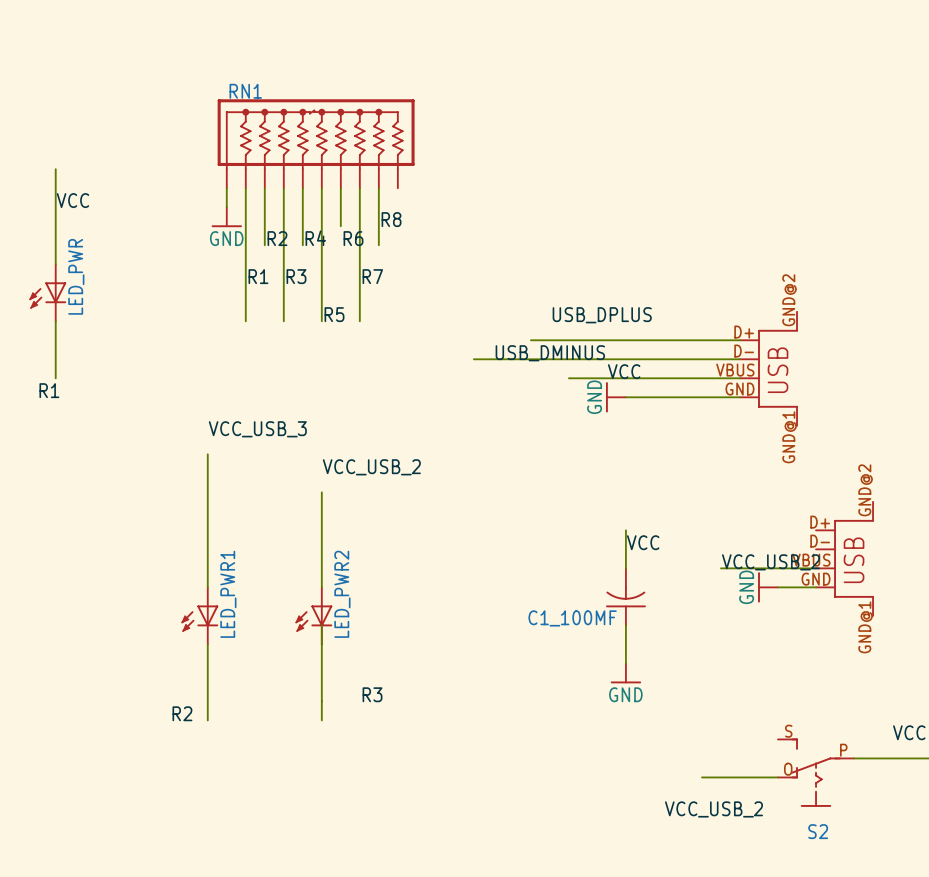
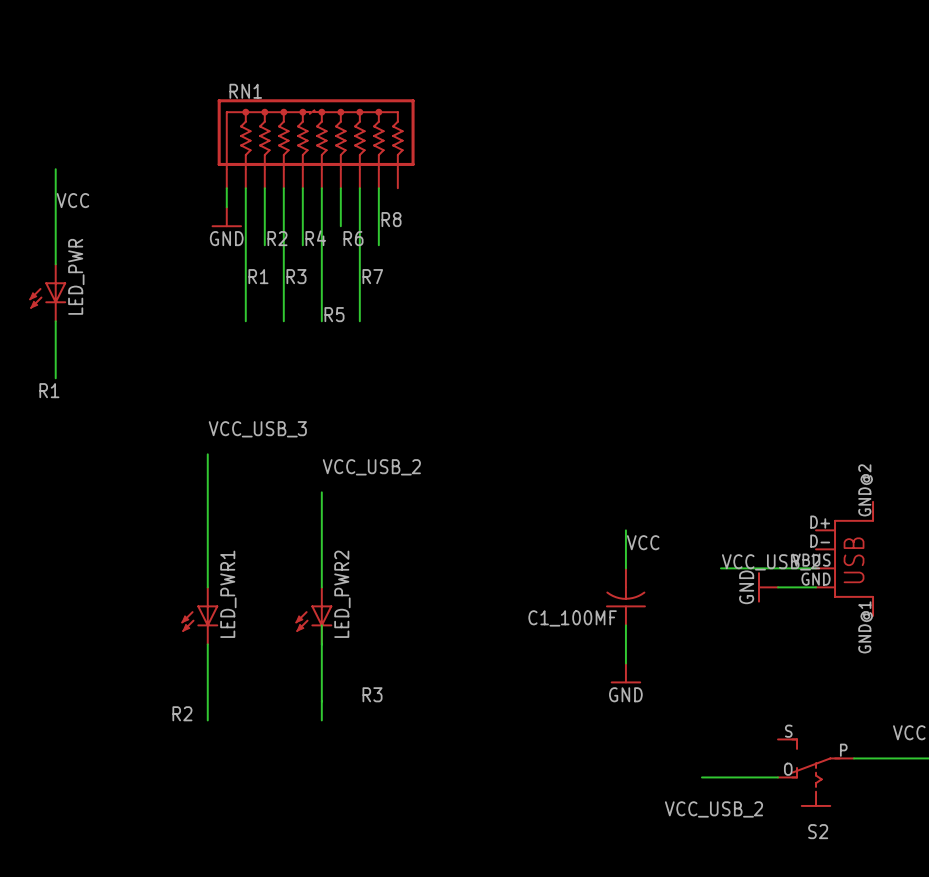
label: USB_DPLUS (602, 315) -> none
wire: (530, 340) (739, 340) -> none
label: USB_DMINUS (550, 353) -> none
wire: (473, 359) (739, 359) -> none
part: (768, 368) -> none
label: VCC (624, 371) -> none
wire: (568, 378) (739, 378) -> none
power symbol: GND (615, 397) -> none
wire: (625, 397) (739, 397) -> none

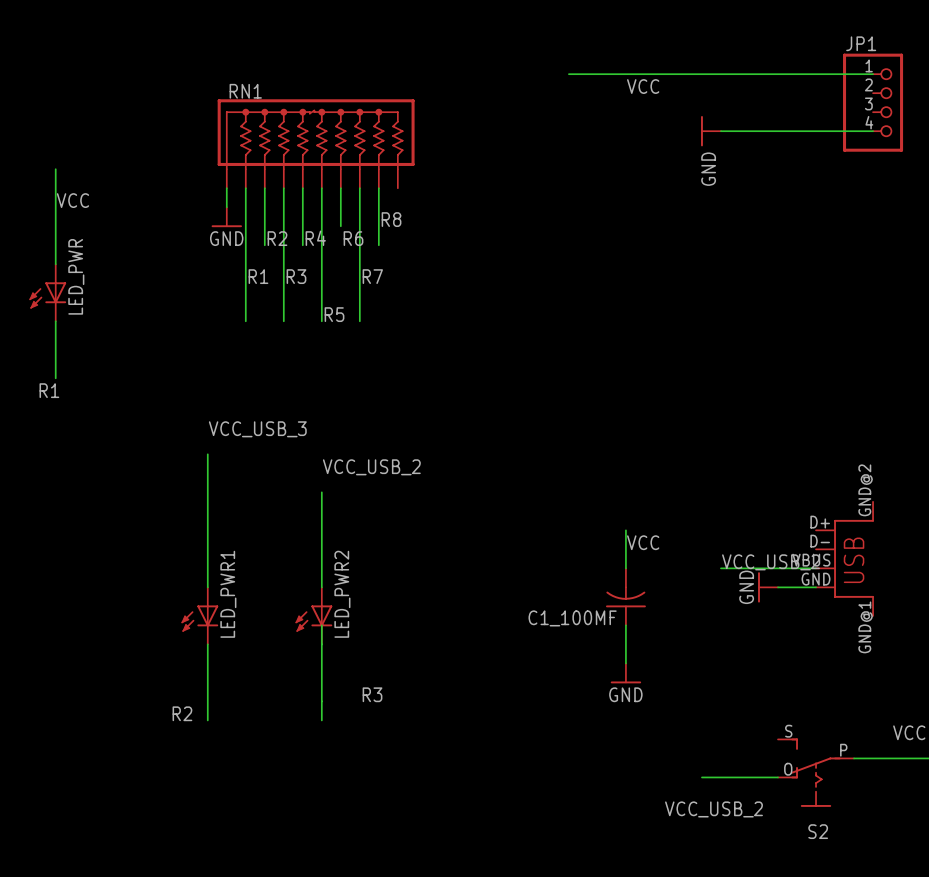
wire: none -> (568, 74) (873, 74)
label: none -> VCC (643, 86)
JP1: none -> (873, 102)
power symbol: none -> GND (711, 131)
wire: none -> (720, 131) (873, 131)

